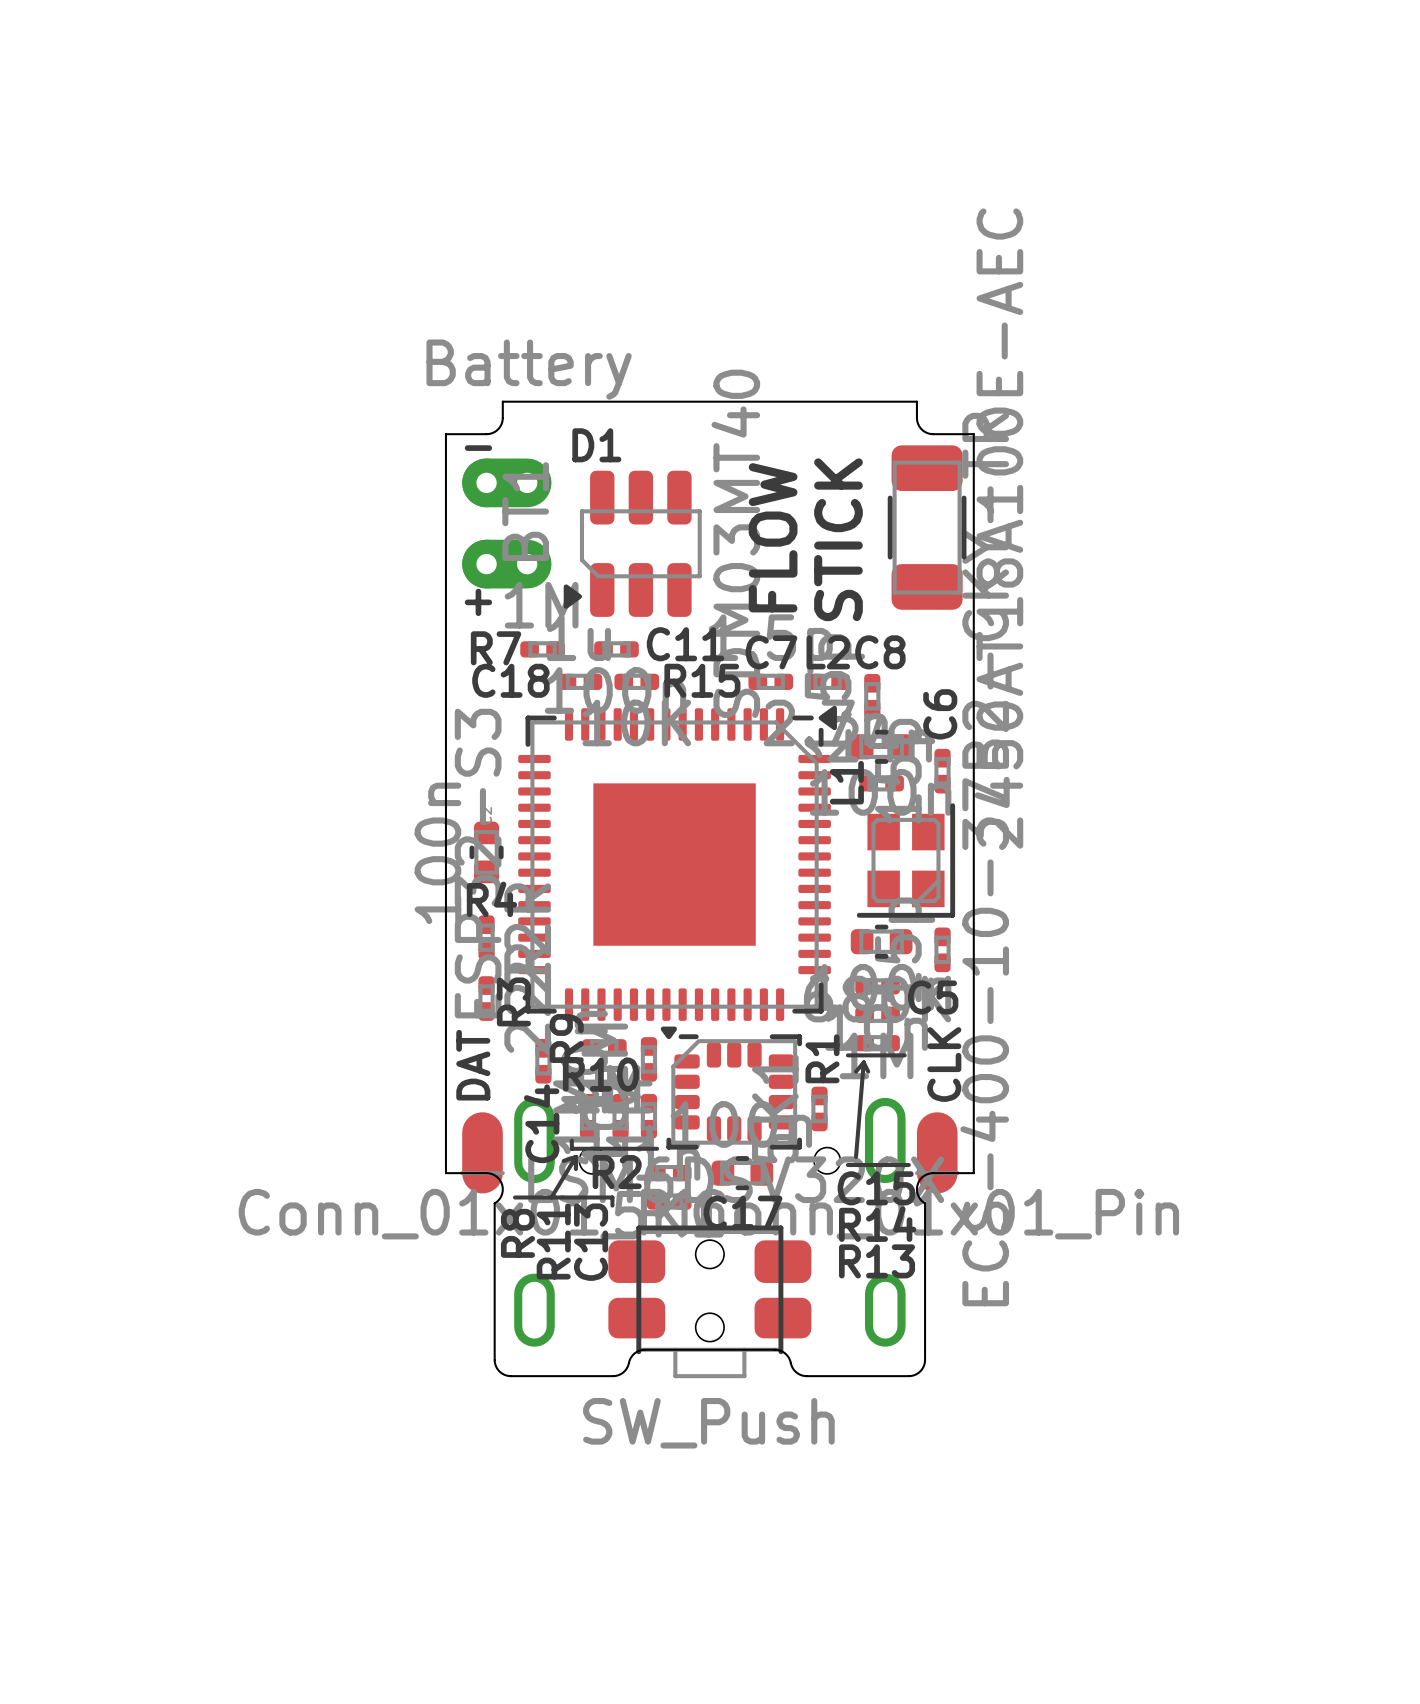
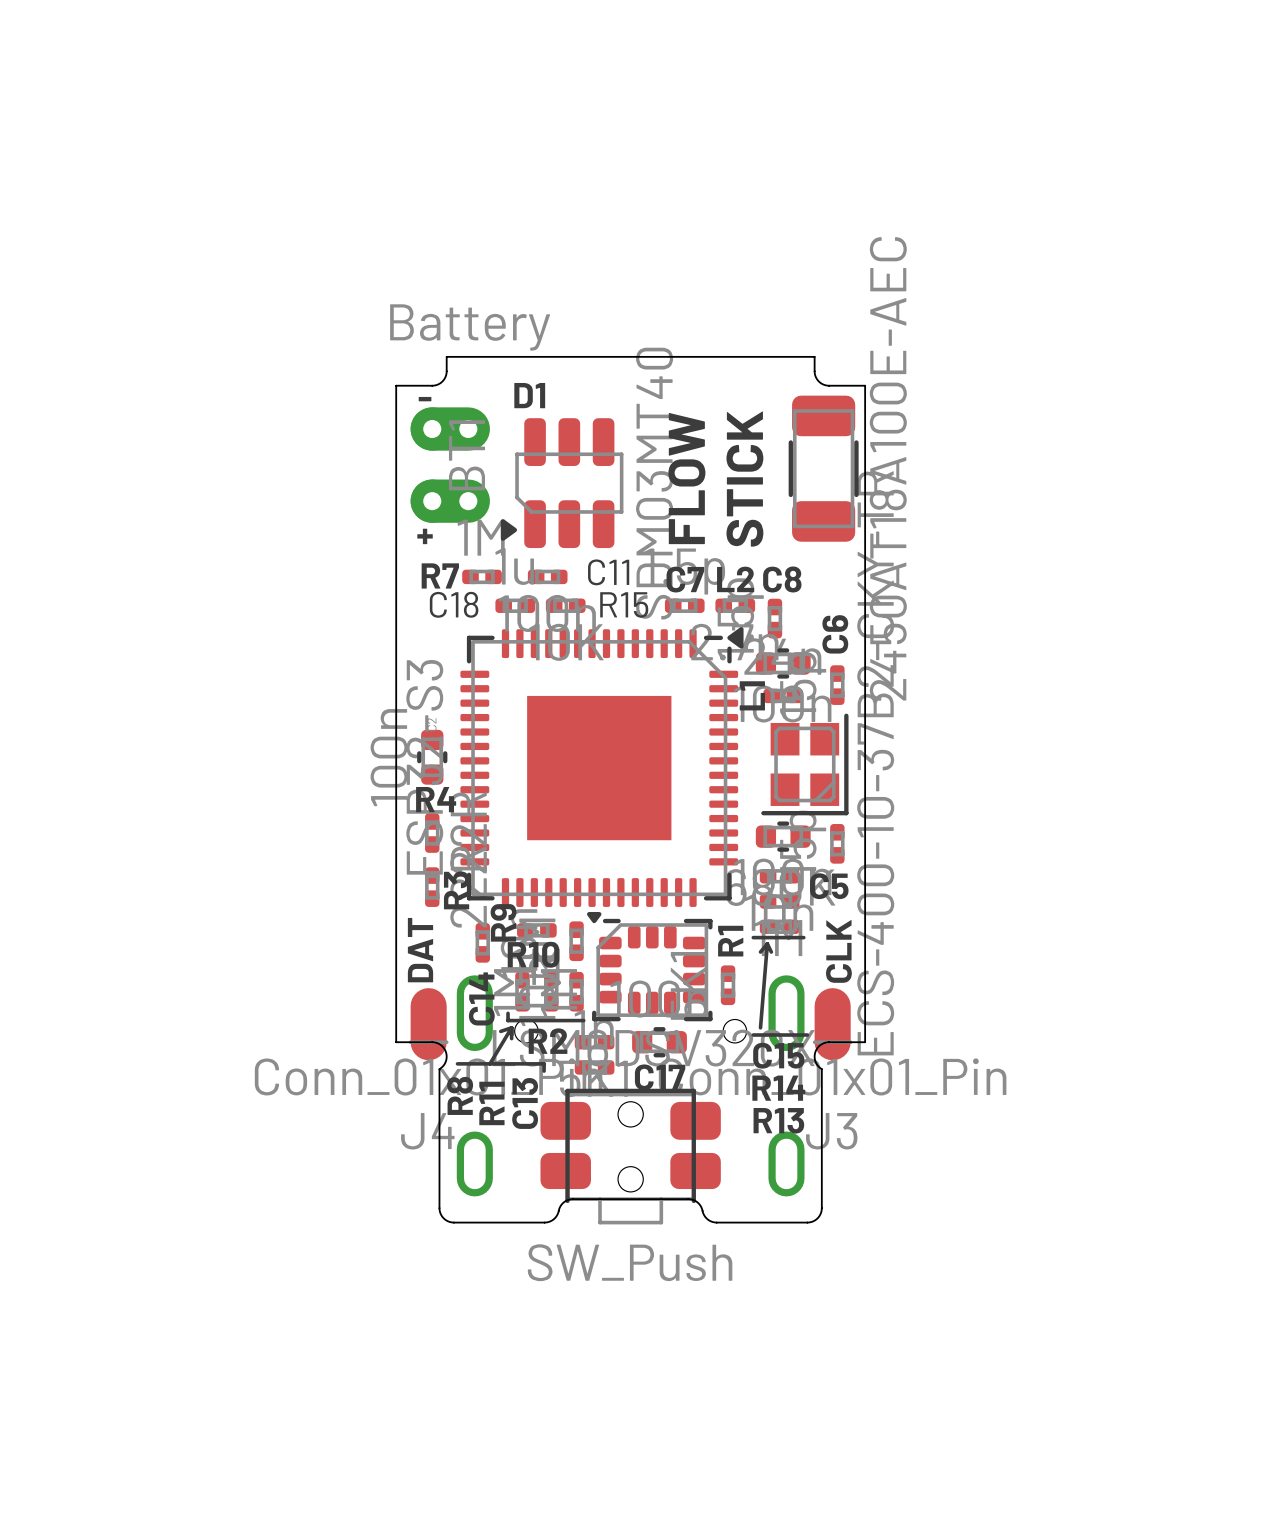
J4 name: none -> J4 (427, 1131)
J3 name: none -> J3 (831, 1131)

